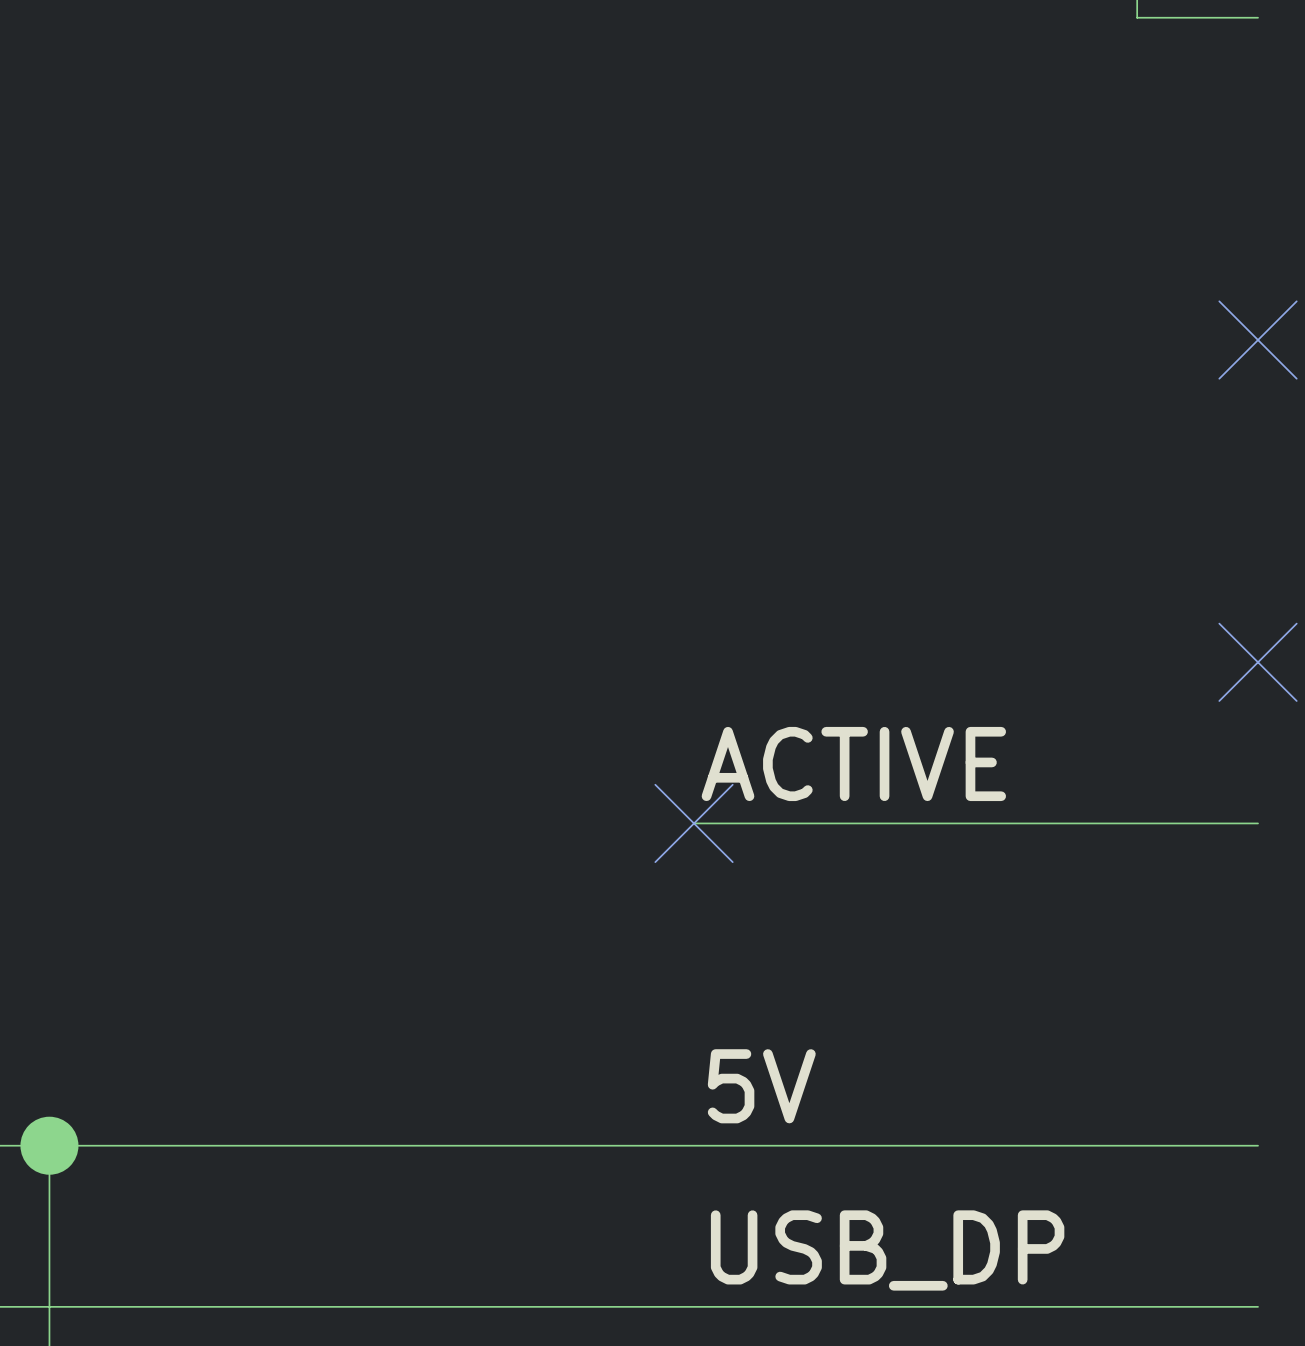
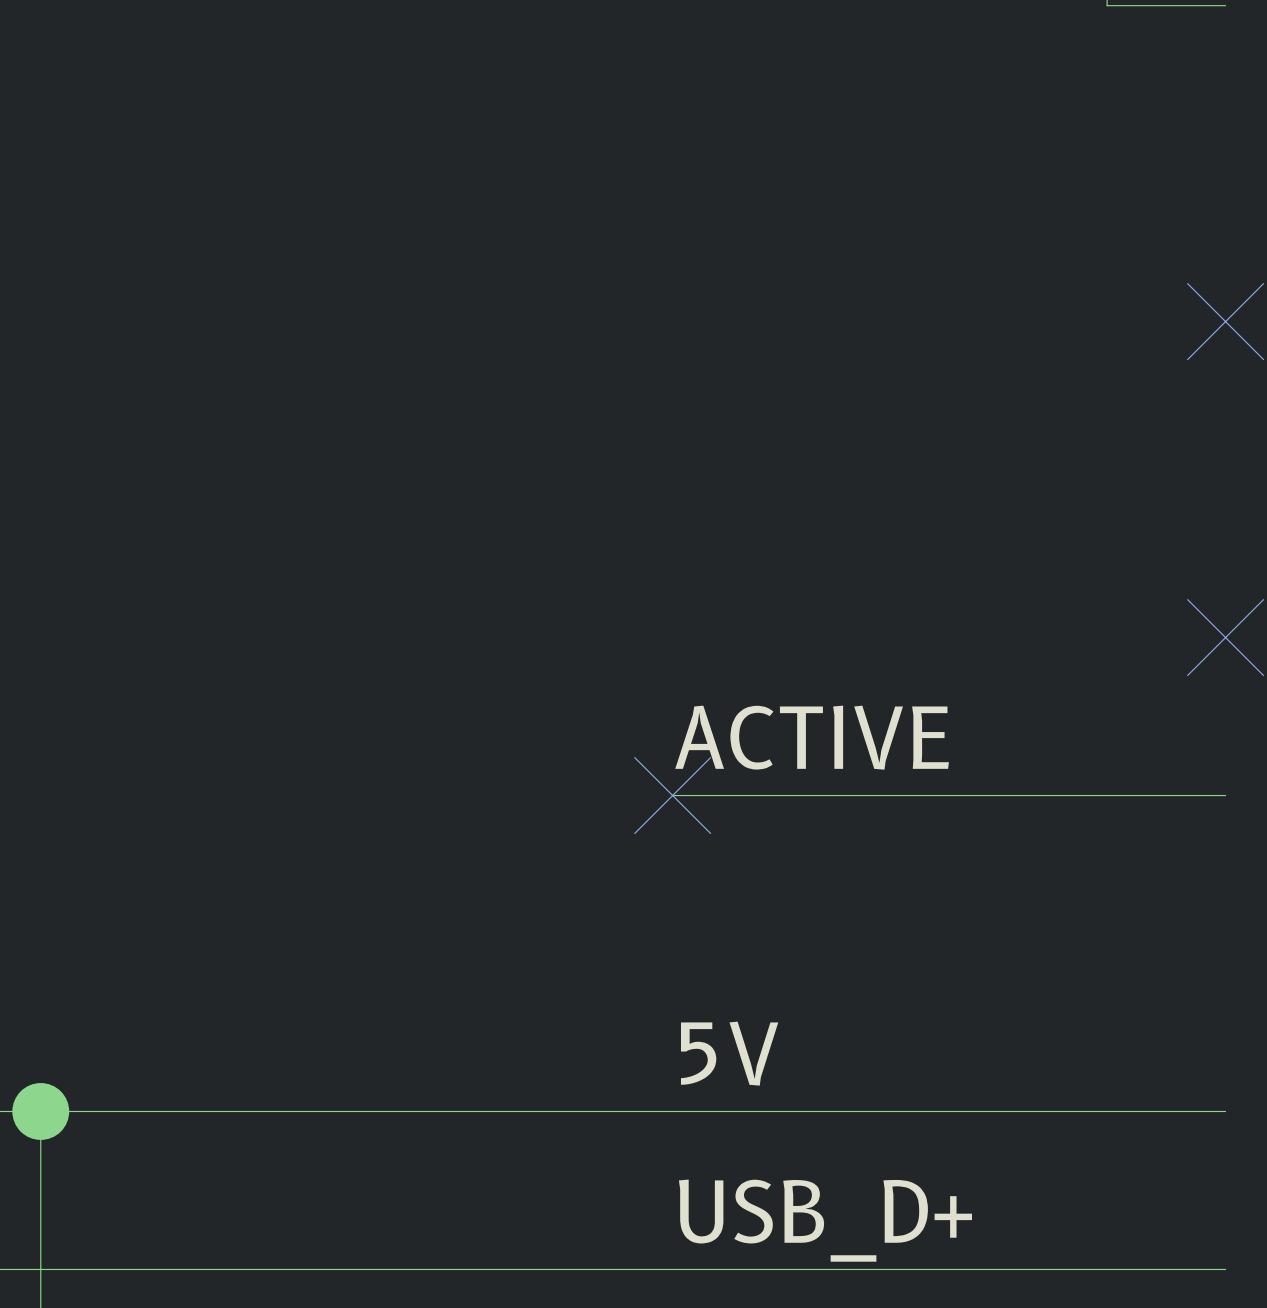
label: USB_DP (887, 1250) -> USB_D+ (825, 1220)

